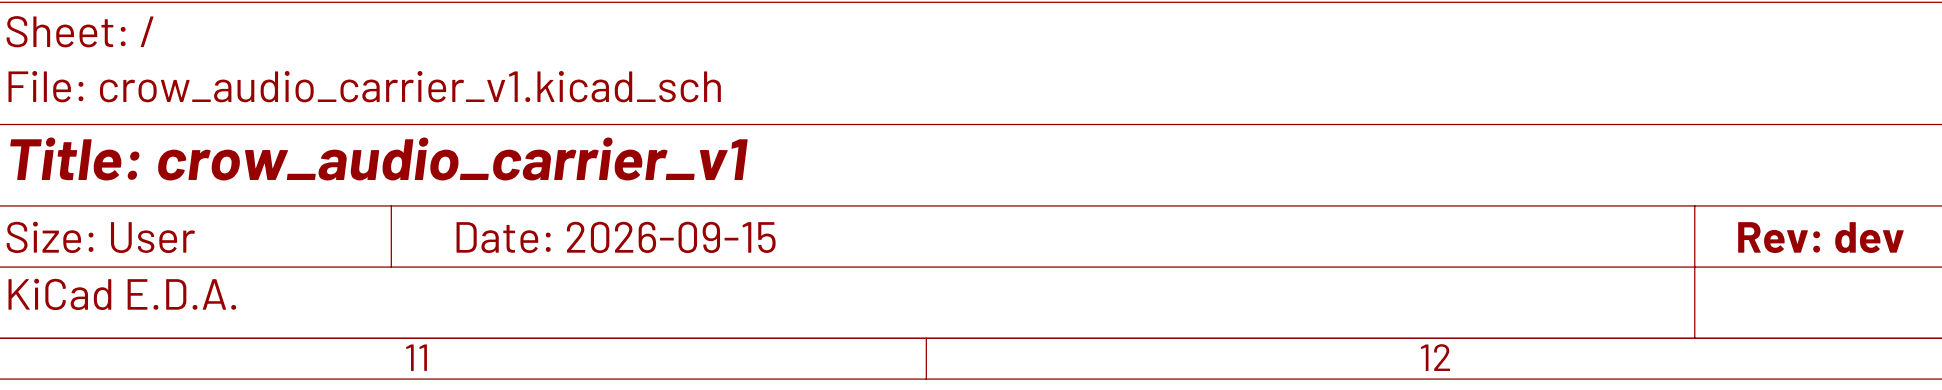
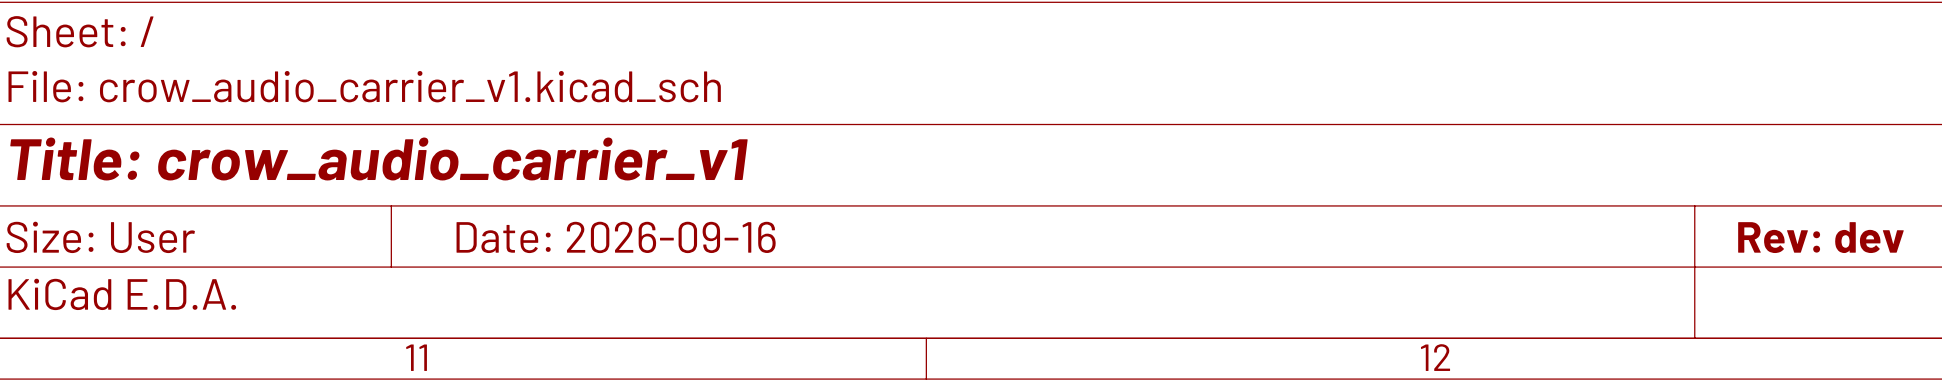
title block: Date: 2026-09-15 (616, 237) -> Date: 2026-09-16 (616, 237)

